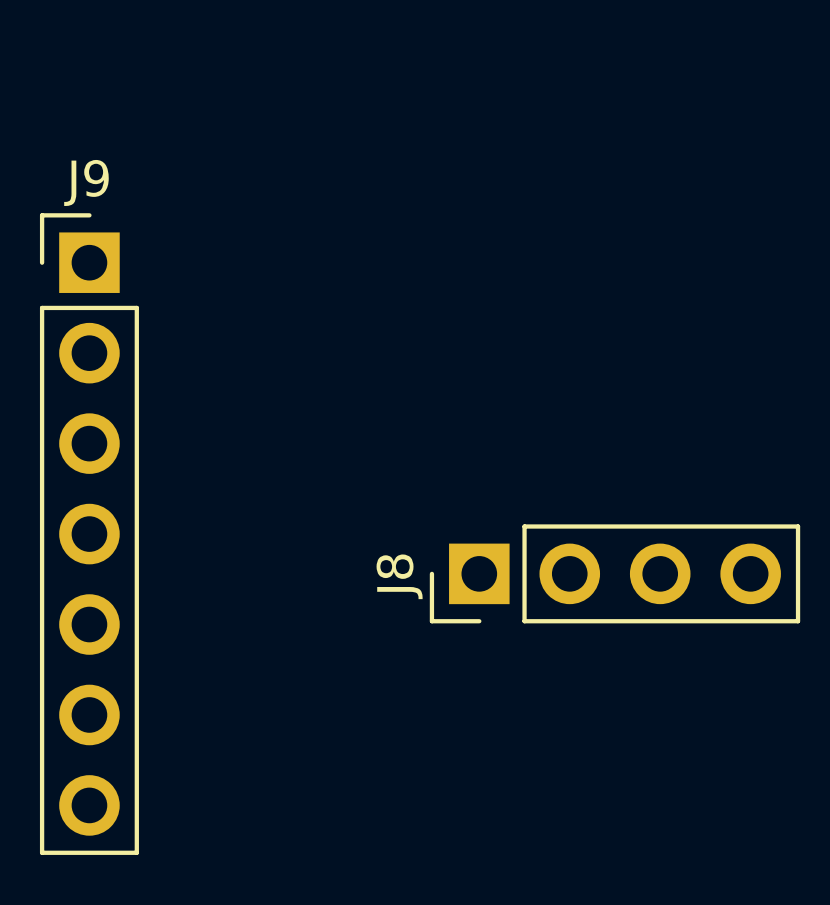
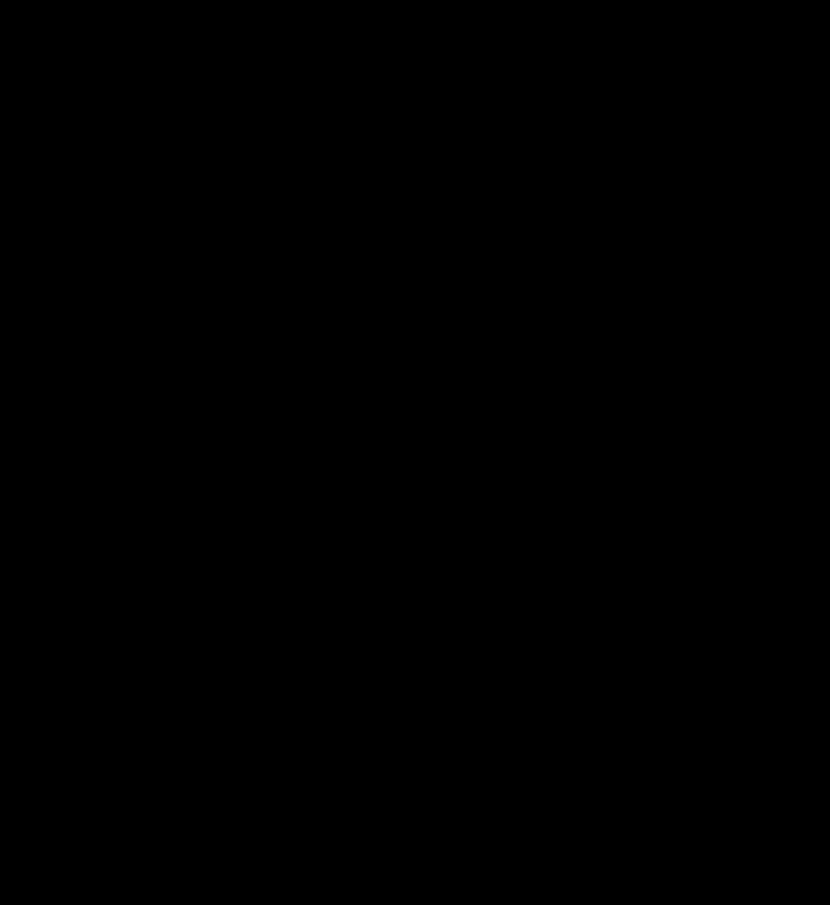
J9: (89, 534) -> none
J8: (614, 573) -> none

